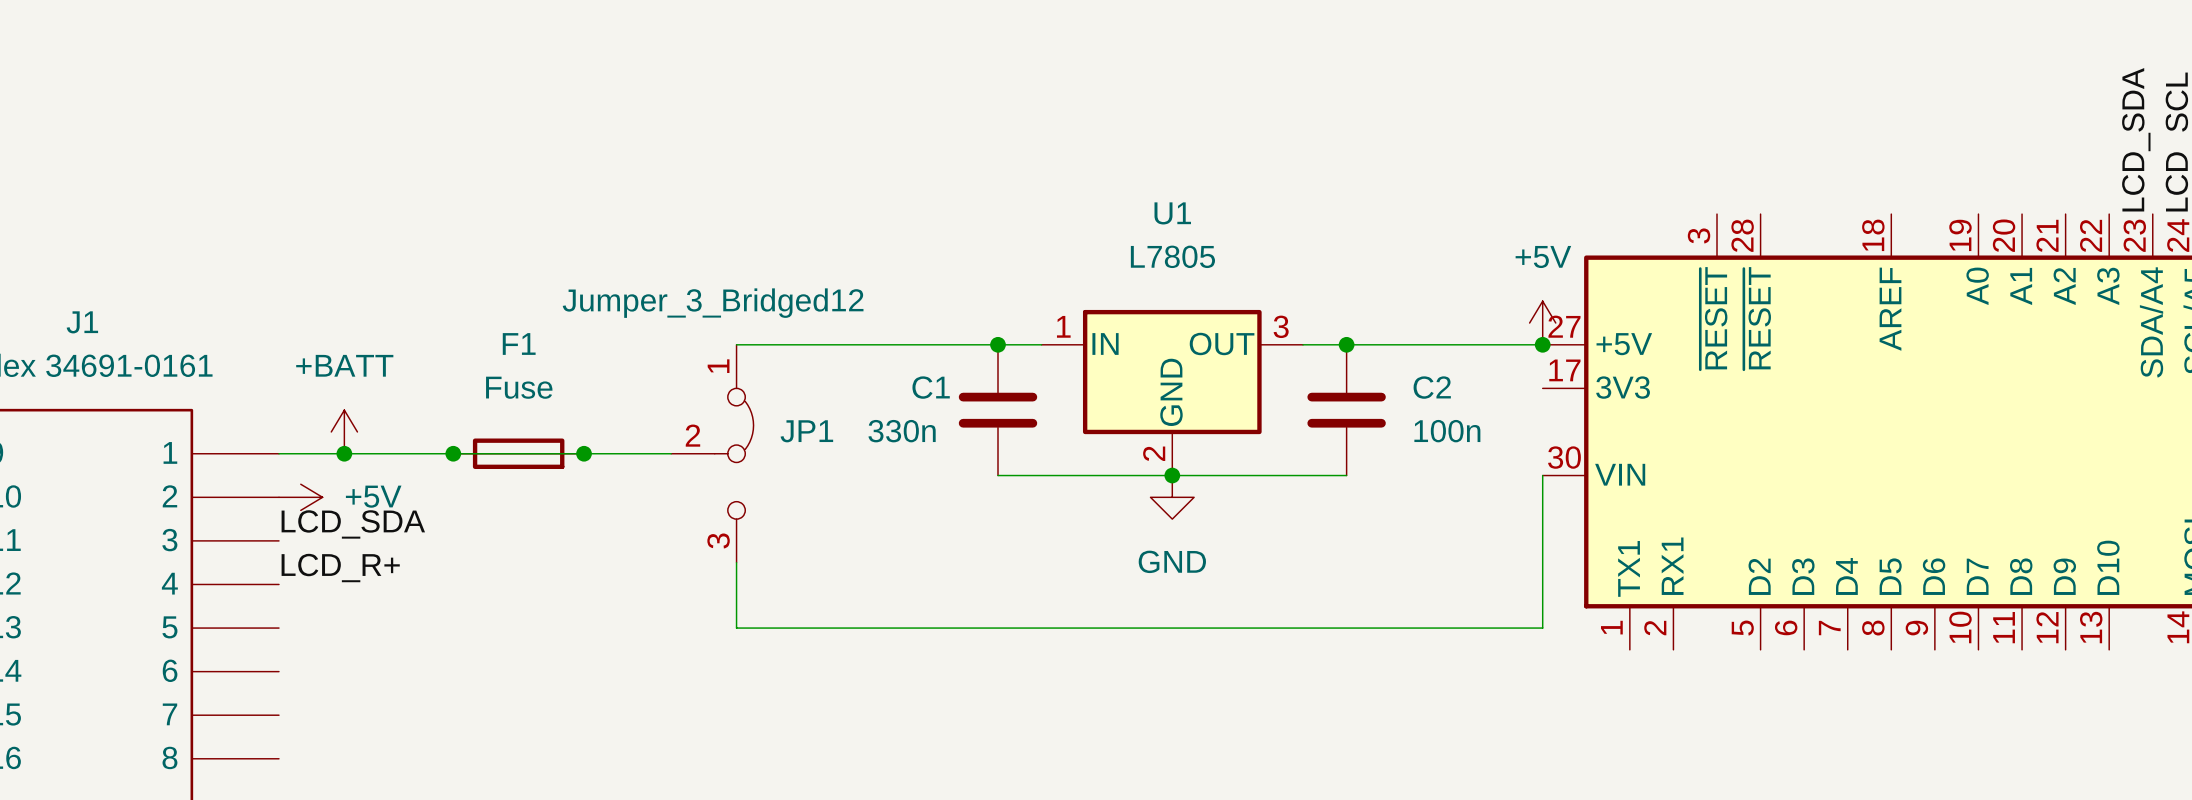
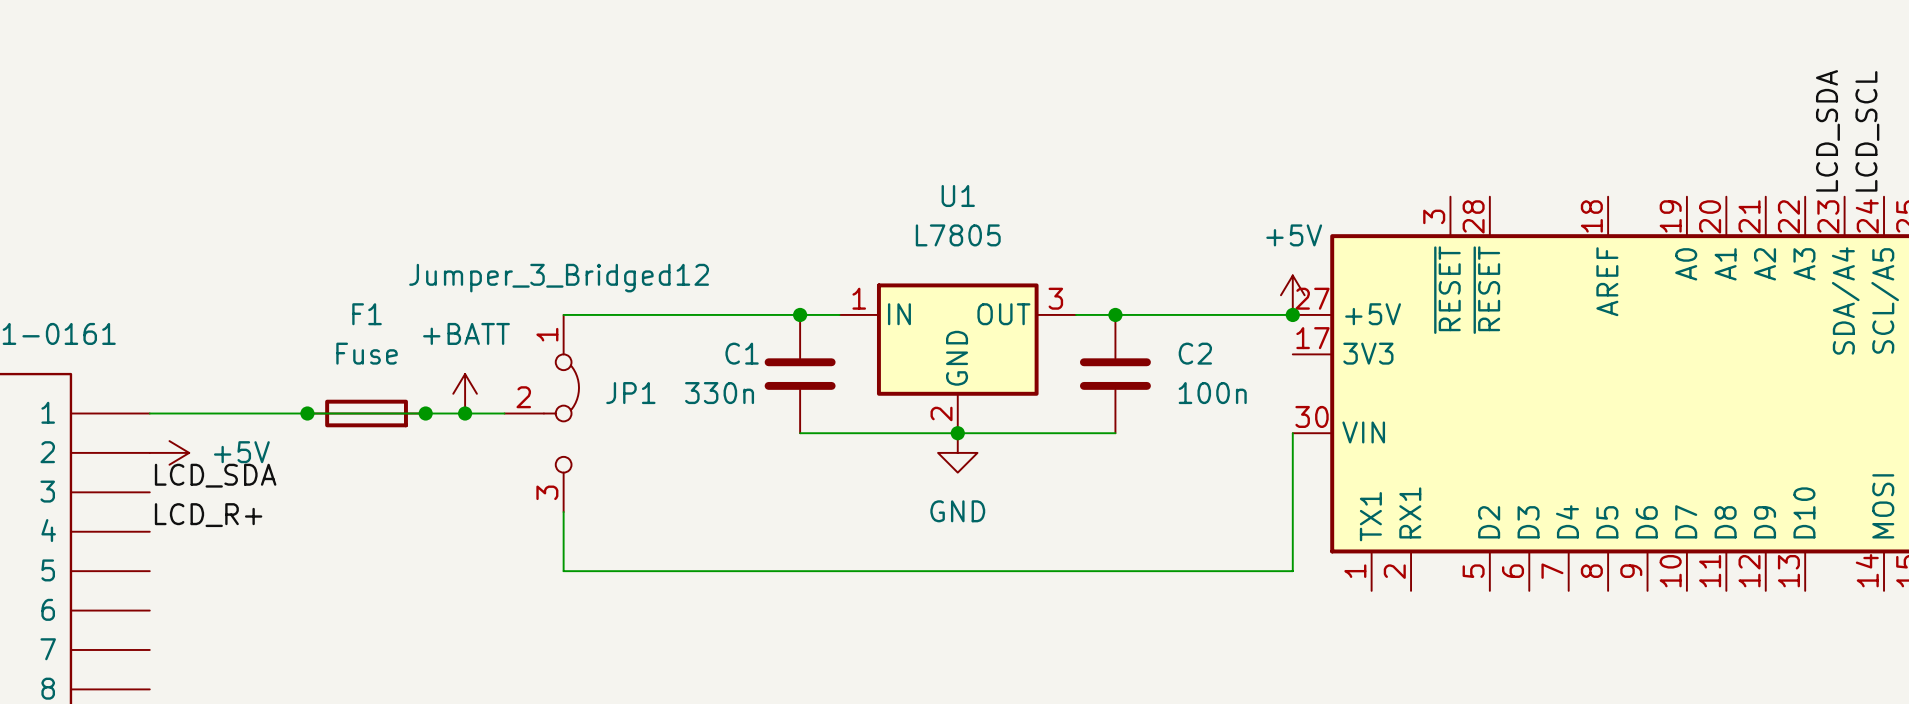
power symbol position: +BATT (344, 431) -> +BATT (465, 393)
junction: (344, 453) -> none
junction: none -> (465, 413)

